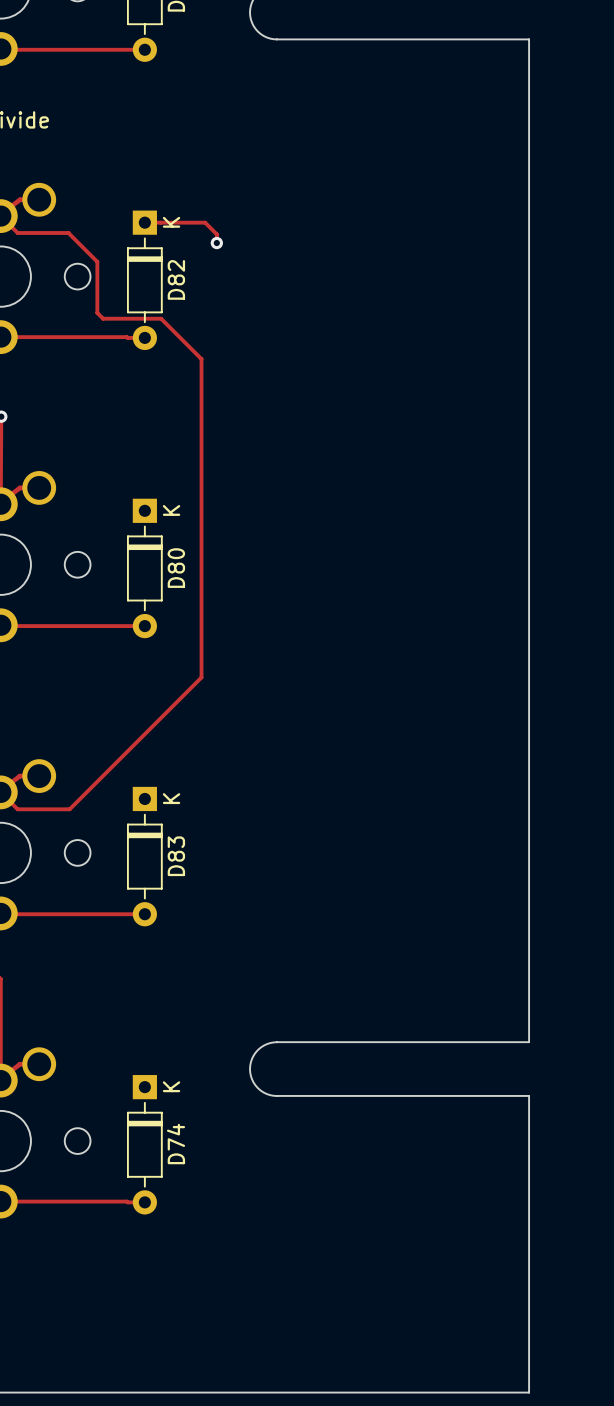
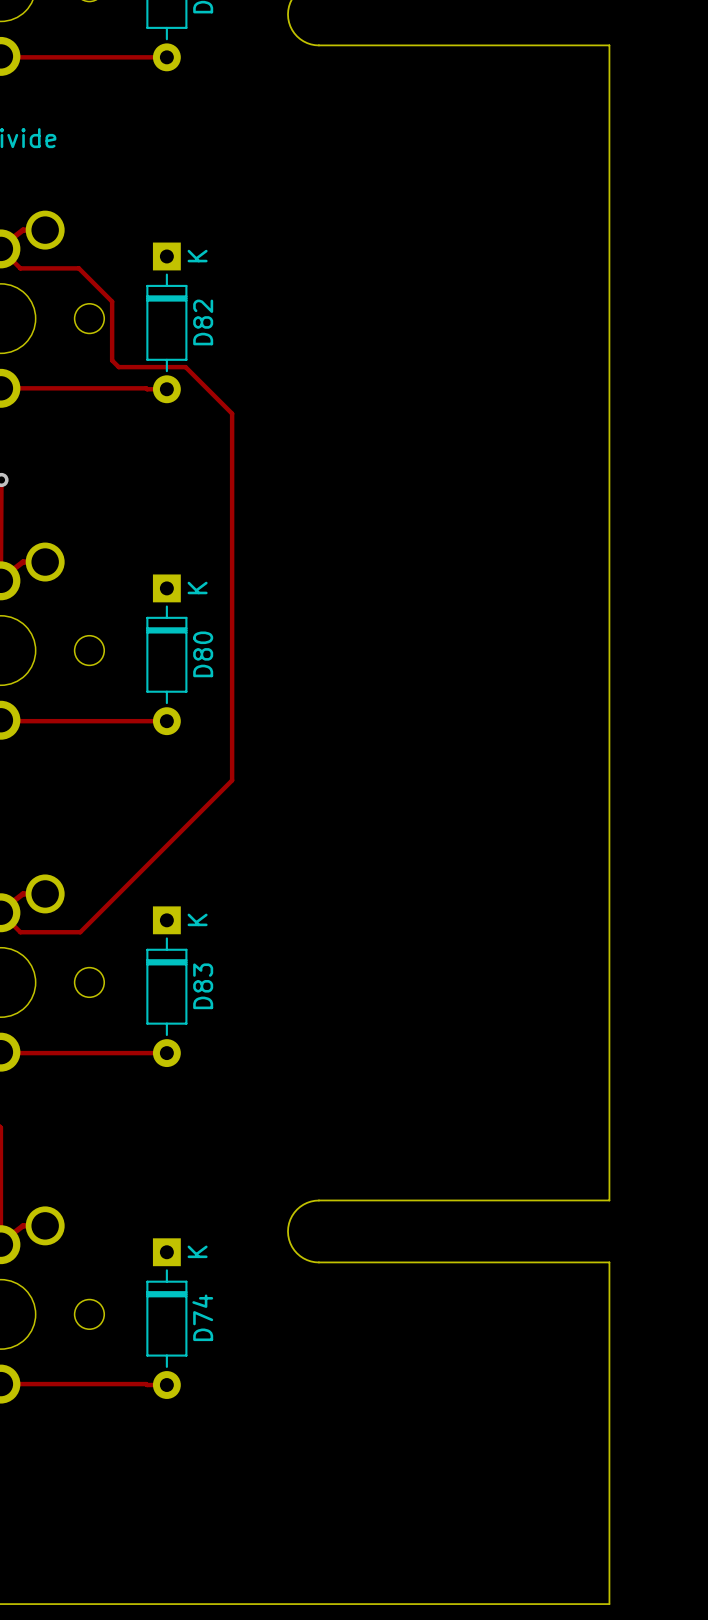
track: (144, 222) (205, 222) (216, 234) (216, 243) -> none
via: (216, 243) -> none

